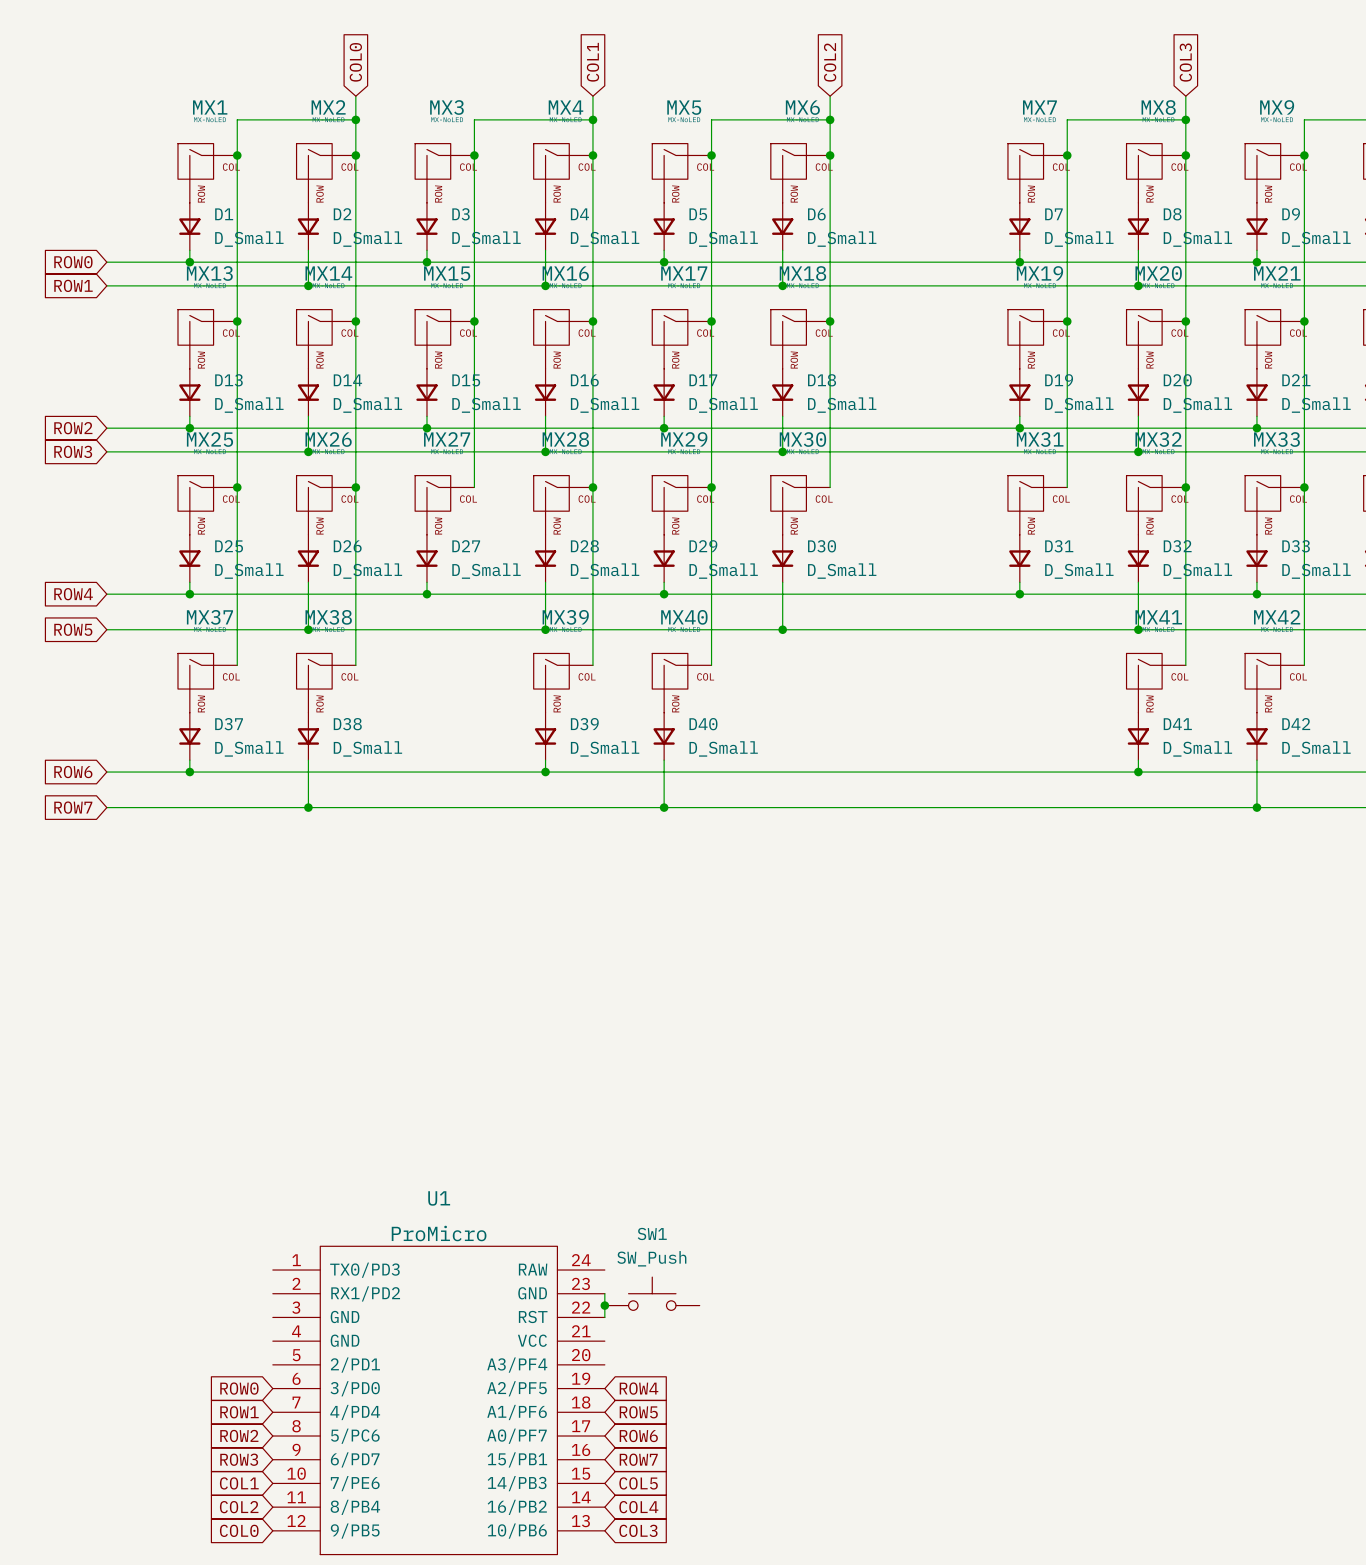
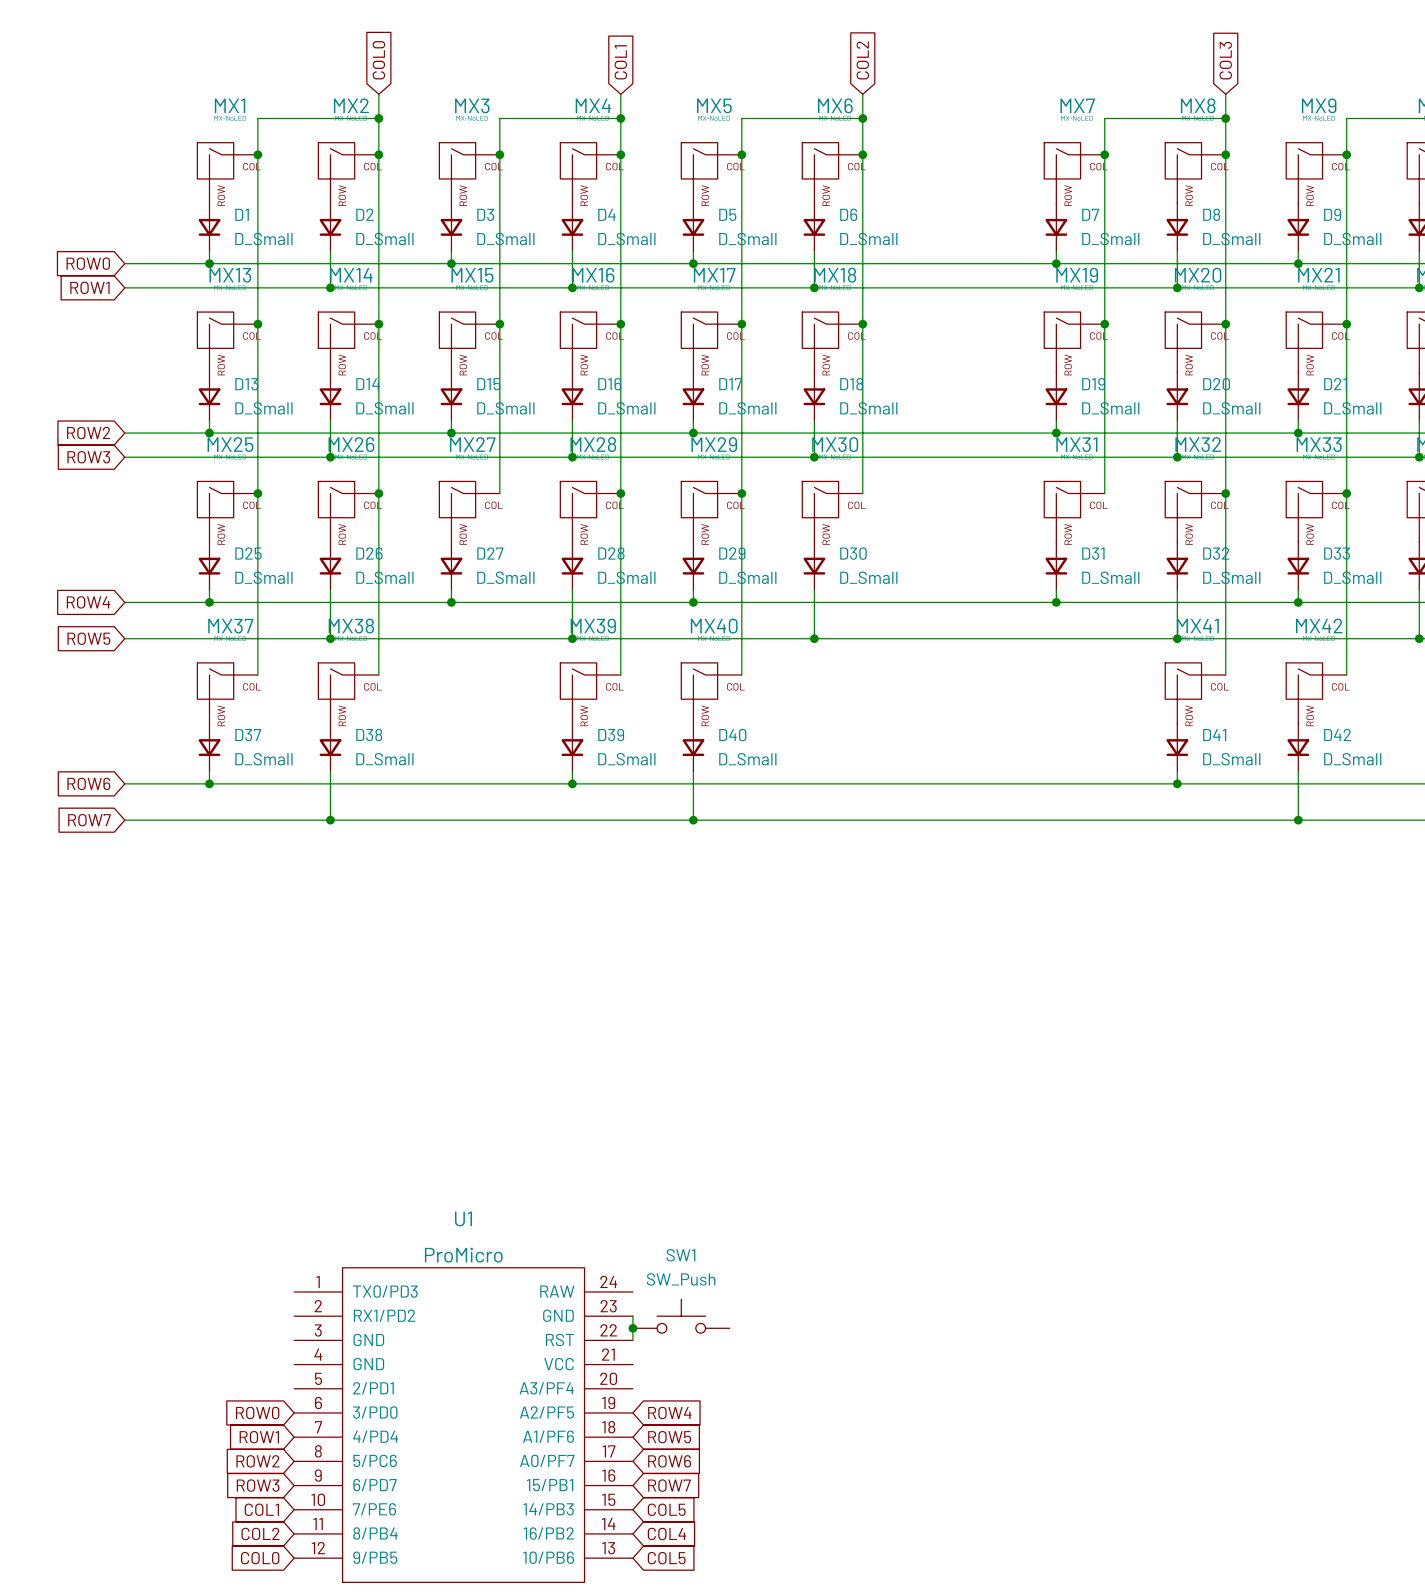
global label: COL3 (638, 1530) -> COL5 (666, 1558)

